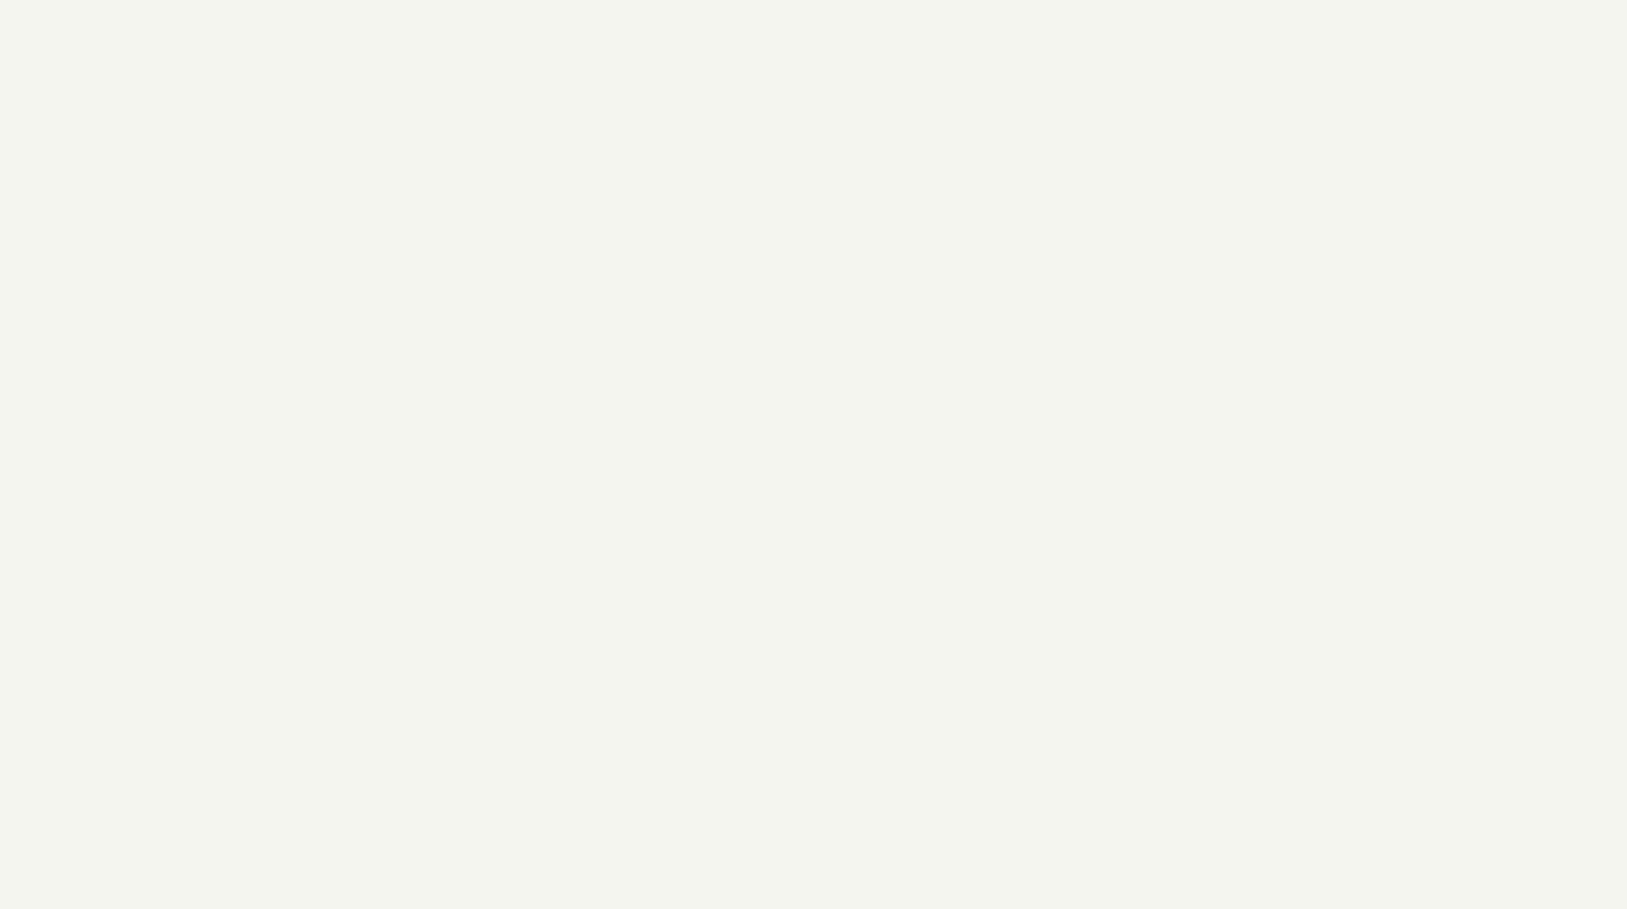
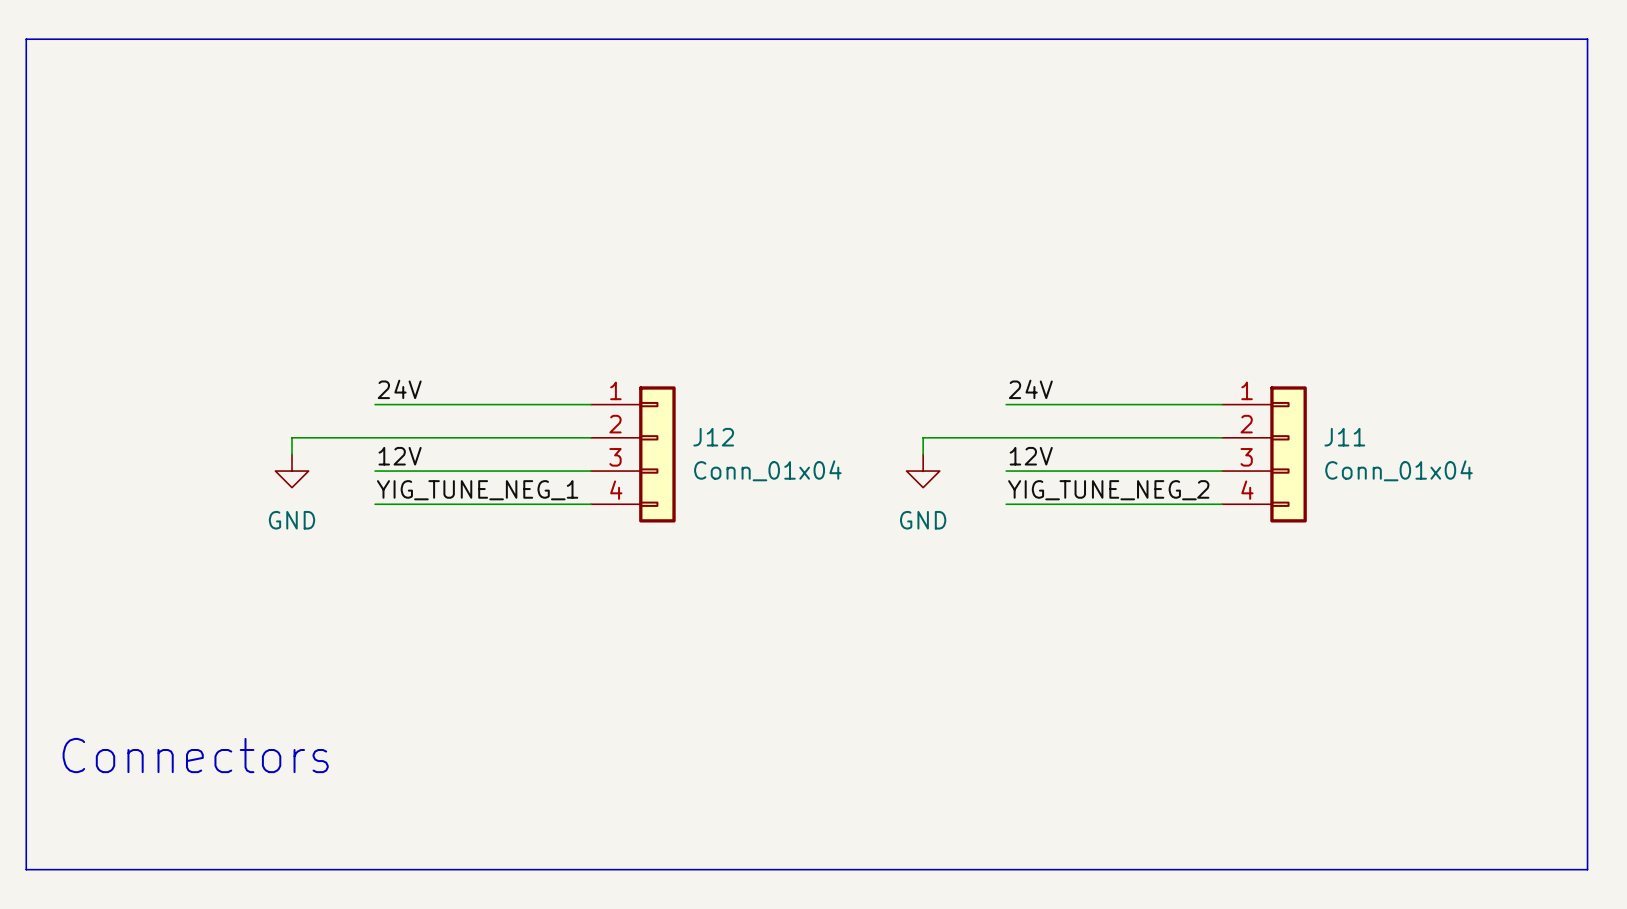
line: none -> (26, 39) (1587, 39) (1587, 869) (26, 869) (26, 39)
label: none -> 24V (399, 389)
label: none -> 24V (1030, 389)
wire: none -> (375, 404) (590, 404)
wire: none -> (1006, 404) (1222, 404)
wire: none -> (590, 437) (292, 437) (292, 454)
wire: none -> (1222, 437) (923, 437) (923, 454)
J12: none -> Conn_01x04 (633, 454)
J11: none -> Conn_01x04 (1264, 454)
label: none -> 12V (400, 456)
label: none -> 12V (1031, 456)
power symbol: none -> GND (292, 471)
wire: none -> (375, 471) (590, 471)
power symbol: none -> GND (923, 471)
wire: none -> (1006, 471) (1222, 471)
label: none -> YIG_TUNE_NEG_1 (477, 490)
label: none -> YIG_TUNE_NEG_2 (1108, 490)
wire: none -> (375, 504) (590, 504)
wire: none -> (1006, 504) (1222, 504)
text: none -> Connectors (195, 755)

